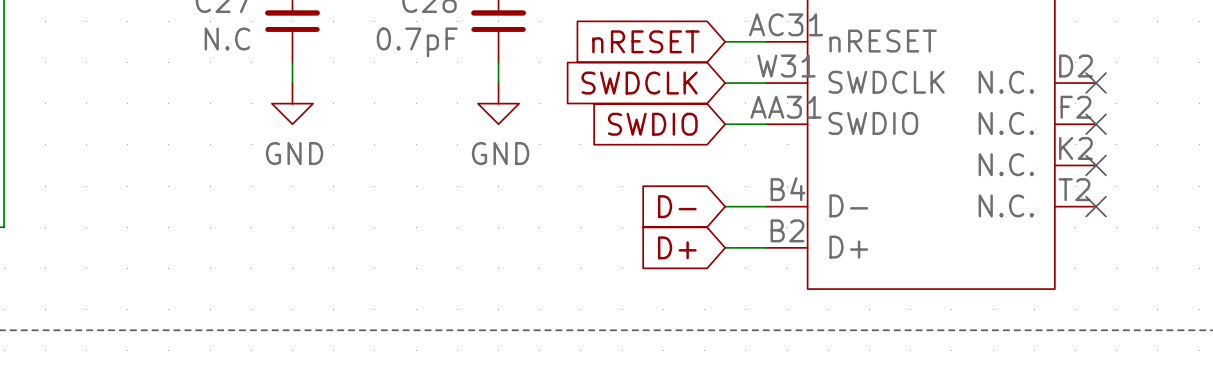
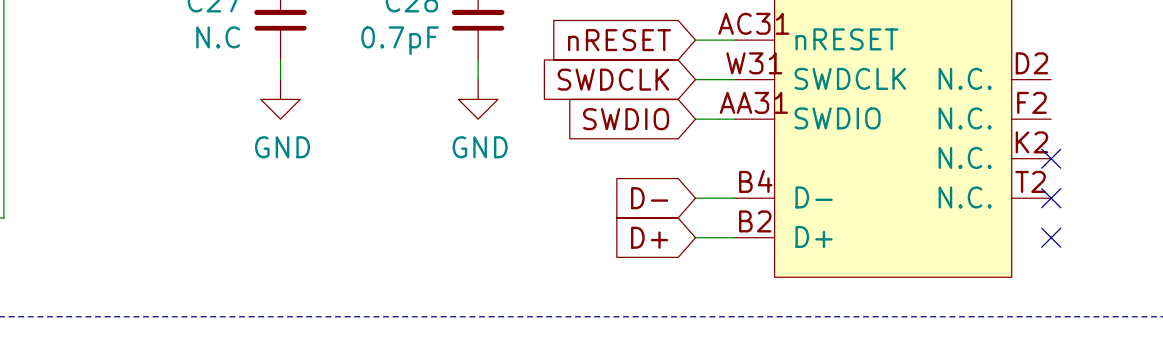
no-connect mark: (1096, 83) -> none
no-connect mark: (1096, 124) -> none
no-connect mark: none -> (1051, 237)

